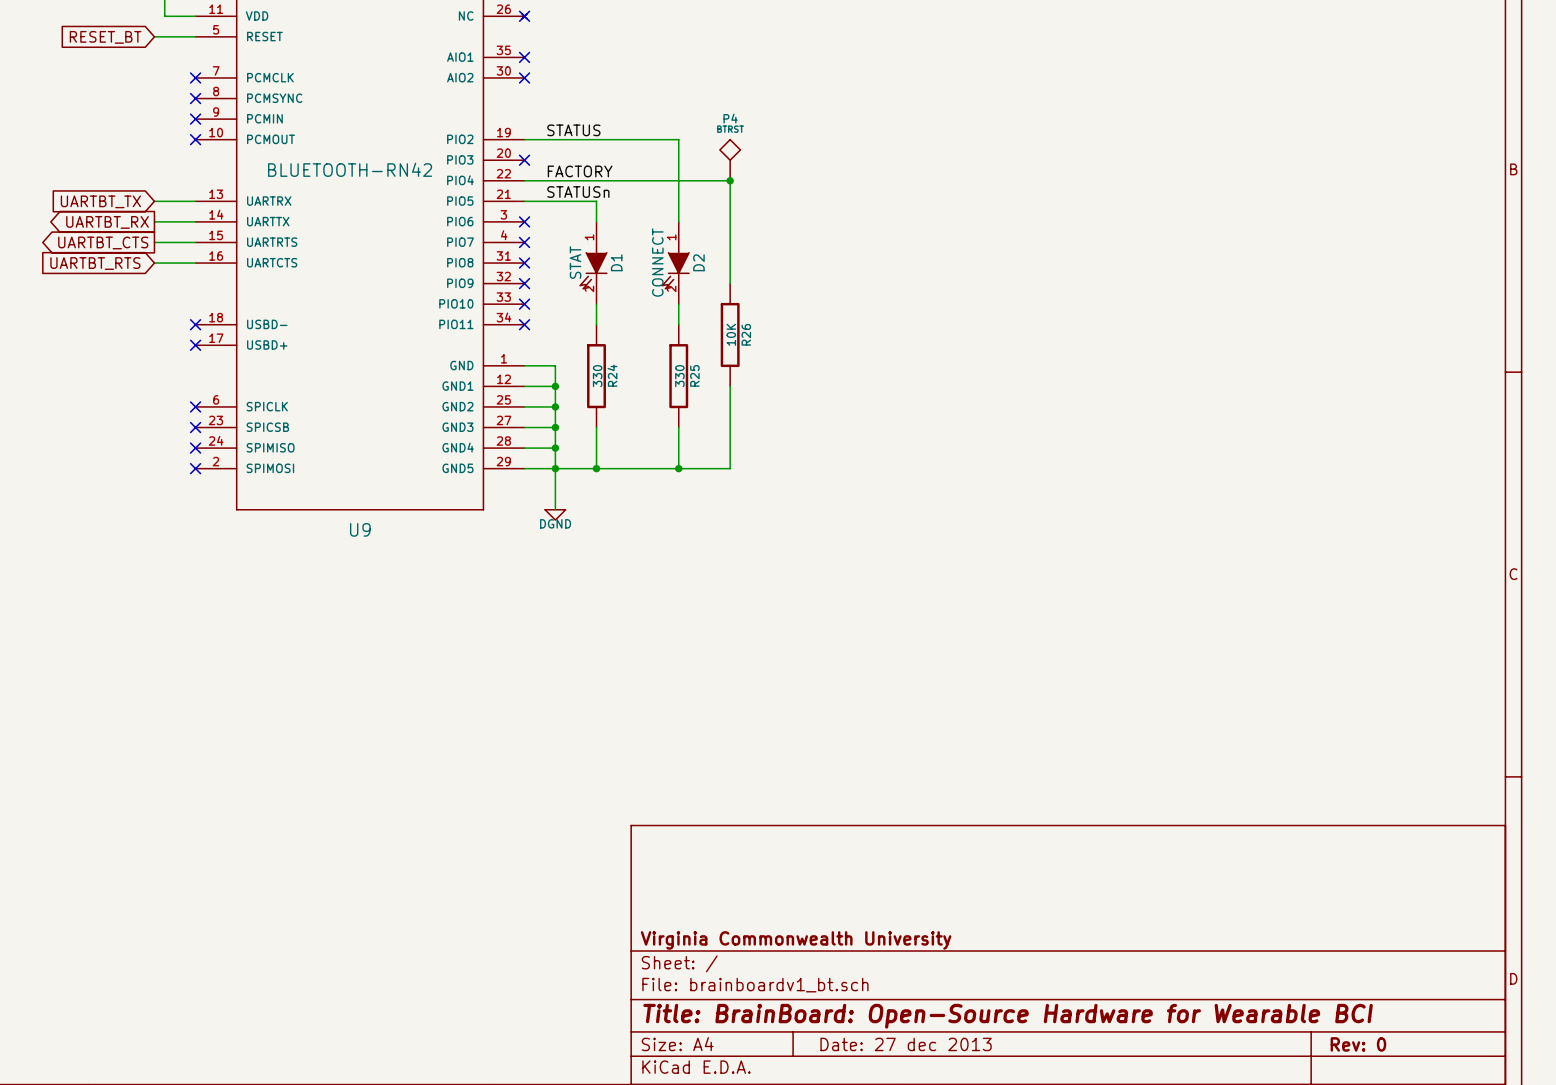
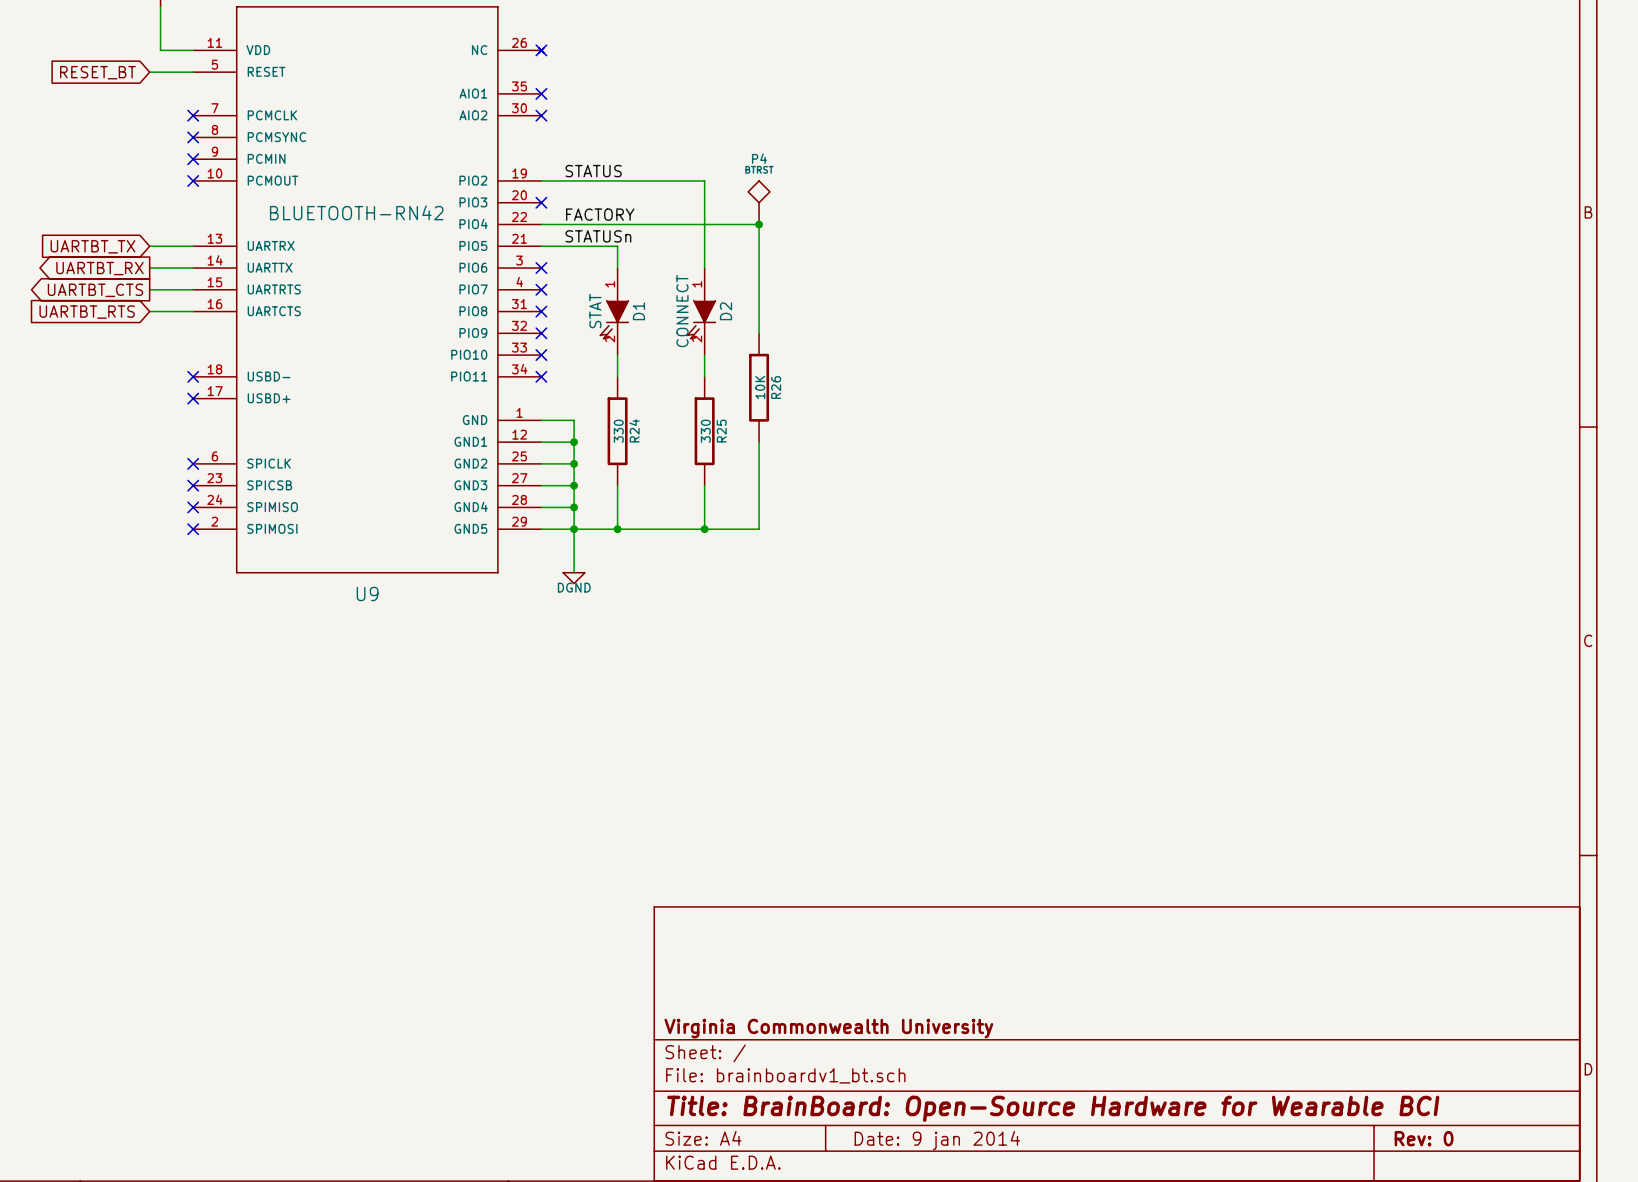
title block: Date: 27 dec 2013 (906, 1044) -> Date: 9 jan 2014 (937, 1140)

